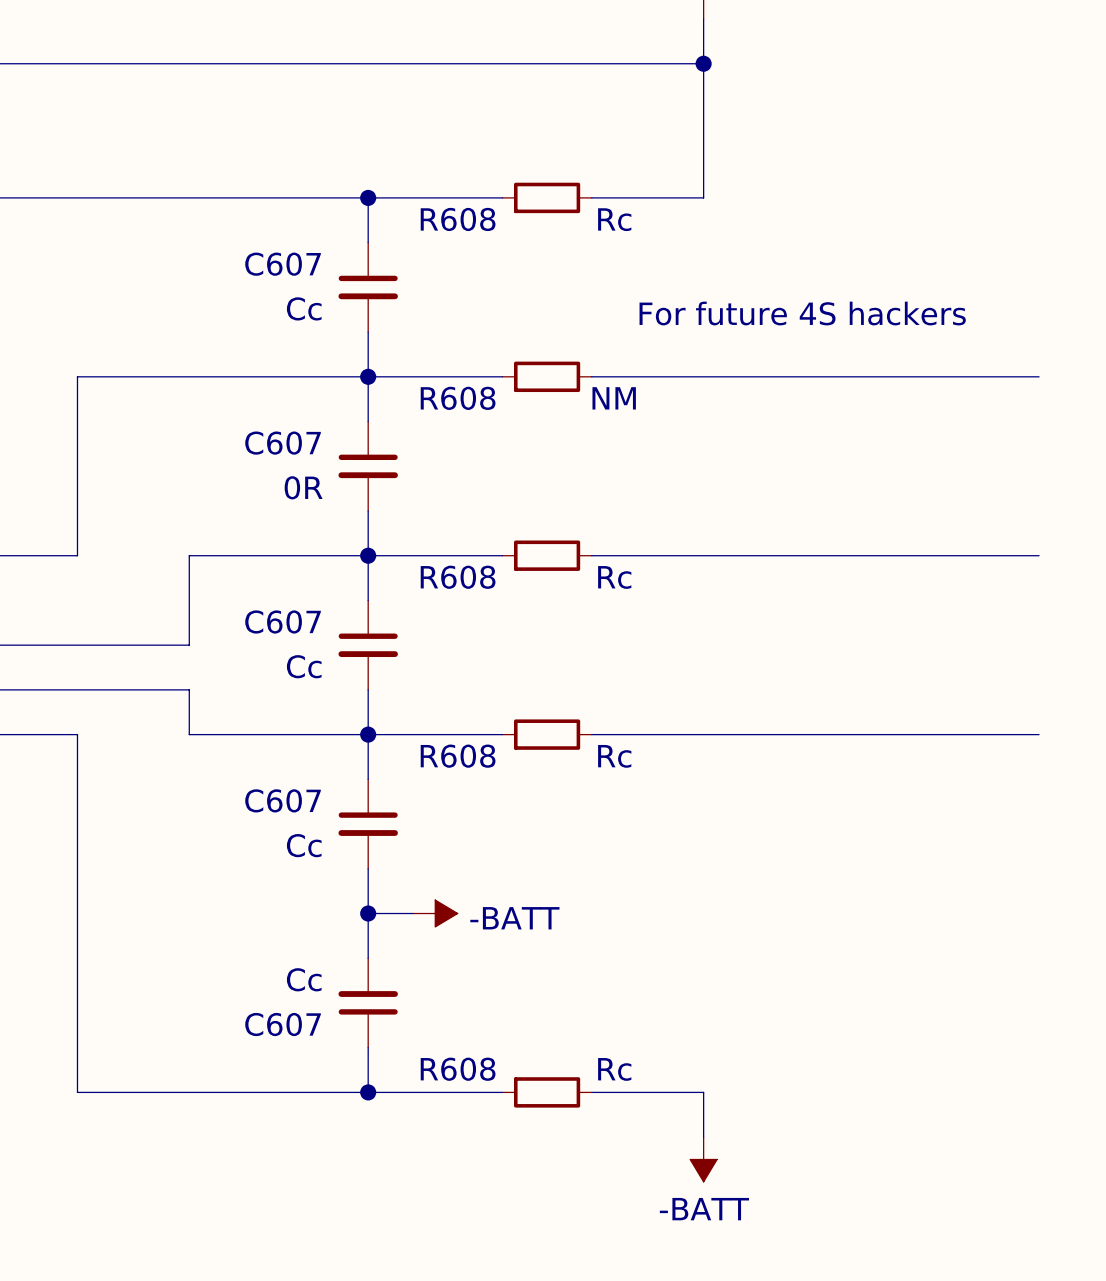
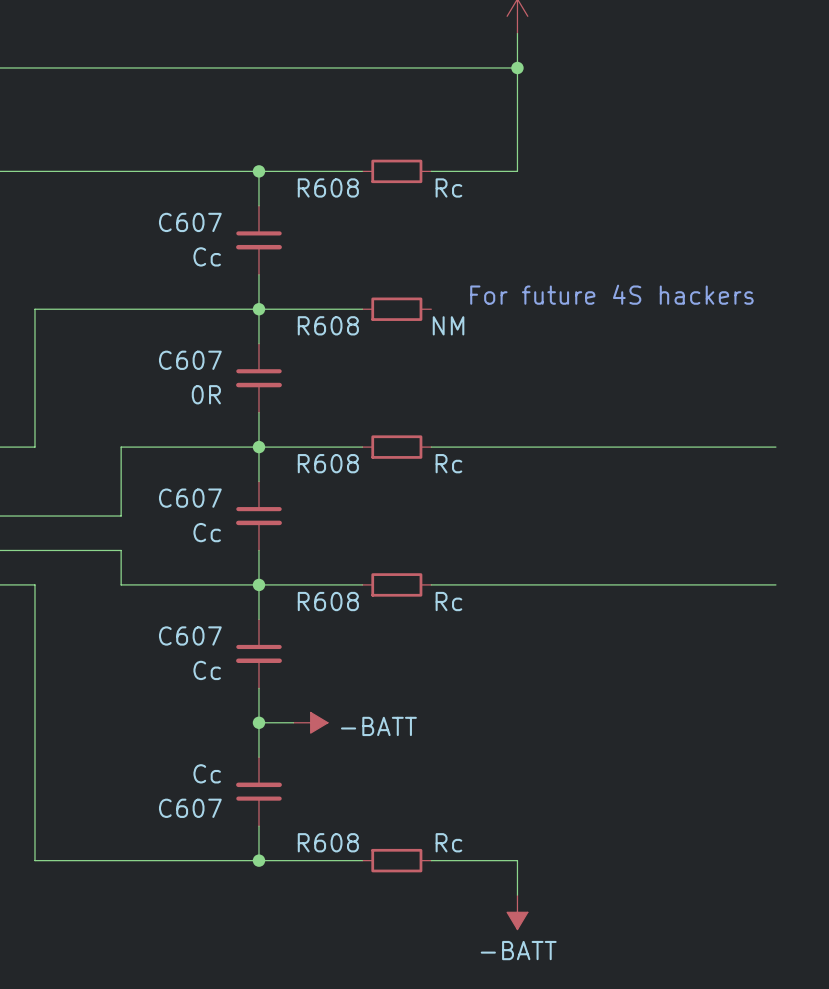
text position: For future 4S hackers (802, 313) -> For future 4S hackers (611, 294)
wire: (591, 376) (1039, 376) -> none

